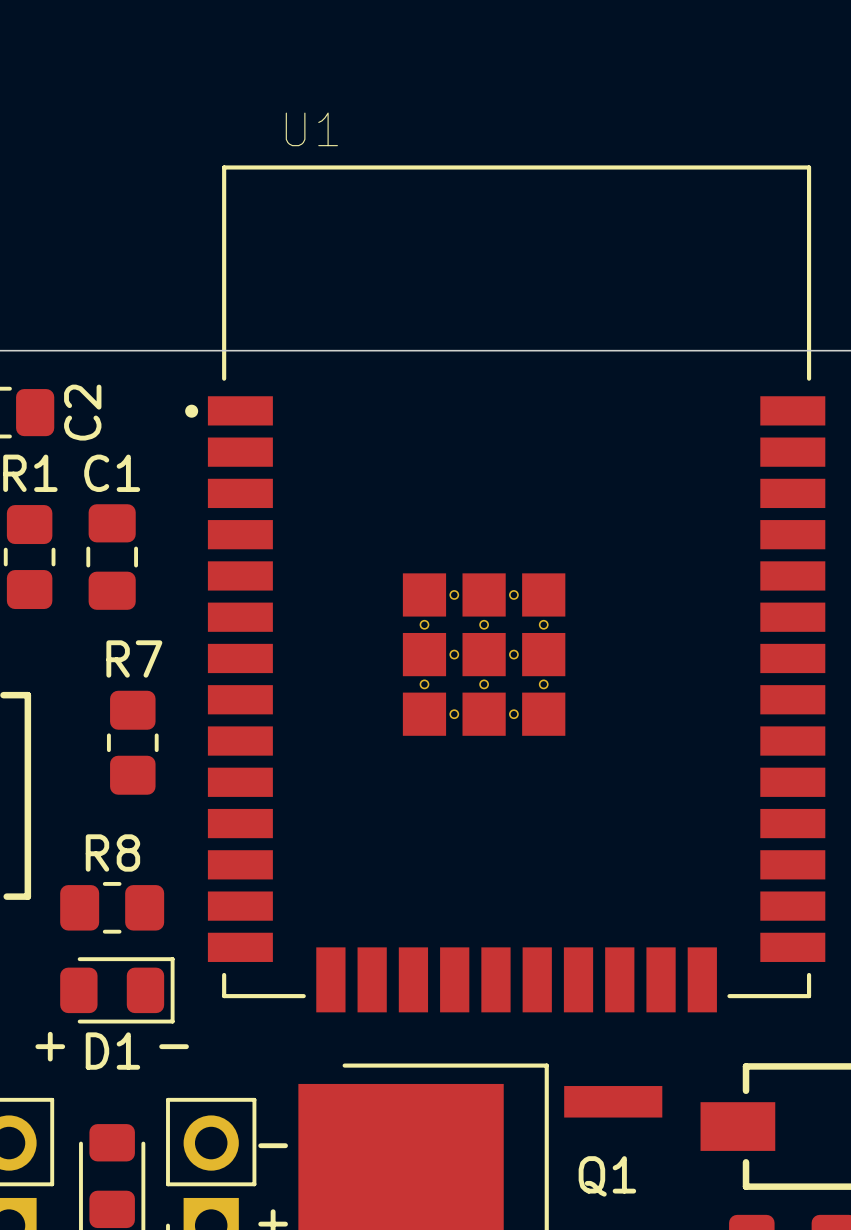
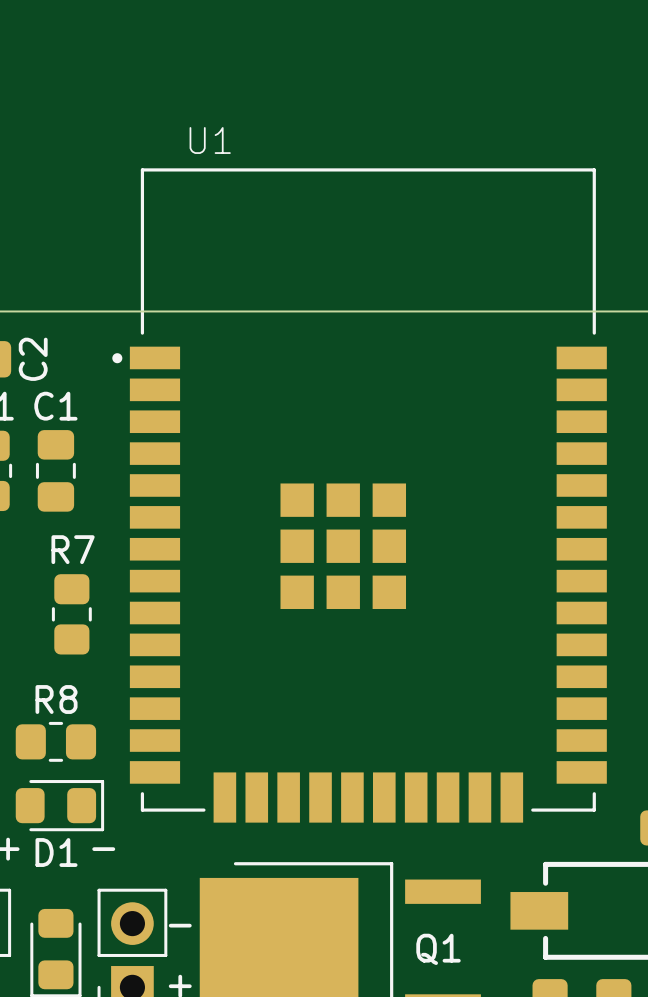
U1 footprint: [185, 165, 826, 1013] -> [112, 168, 607, 823]

